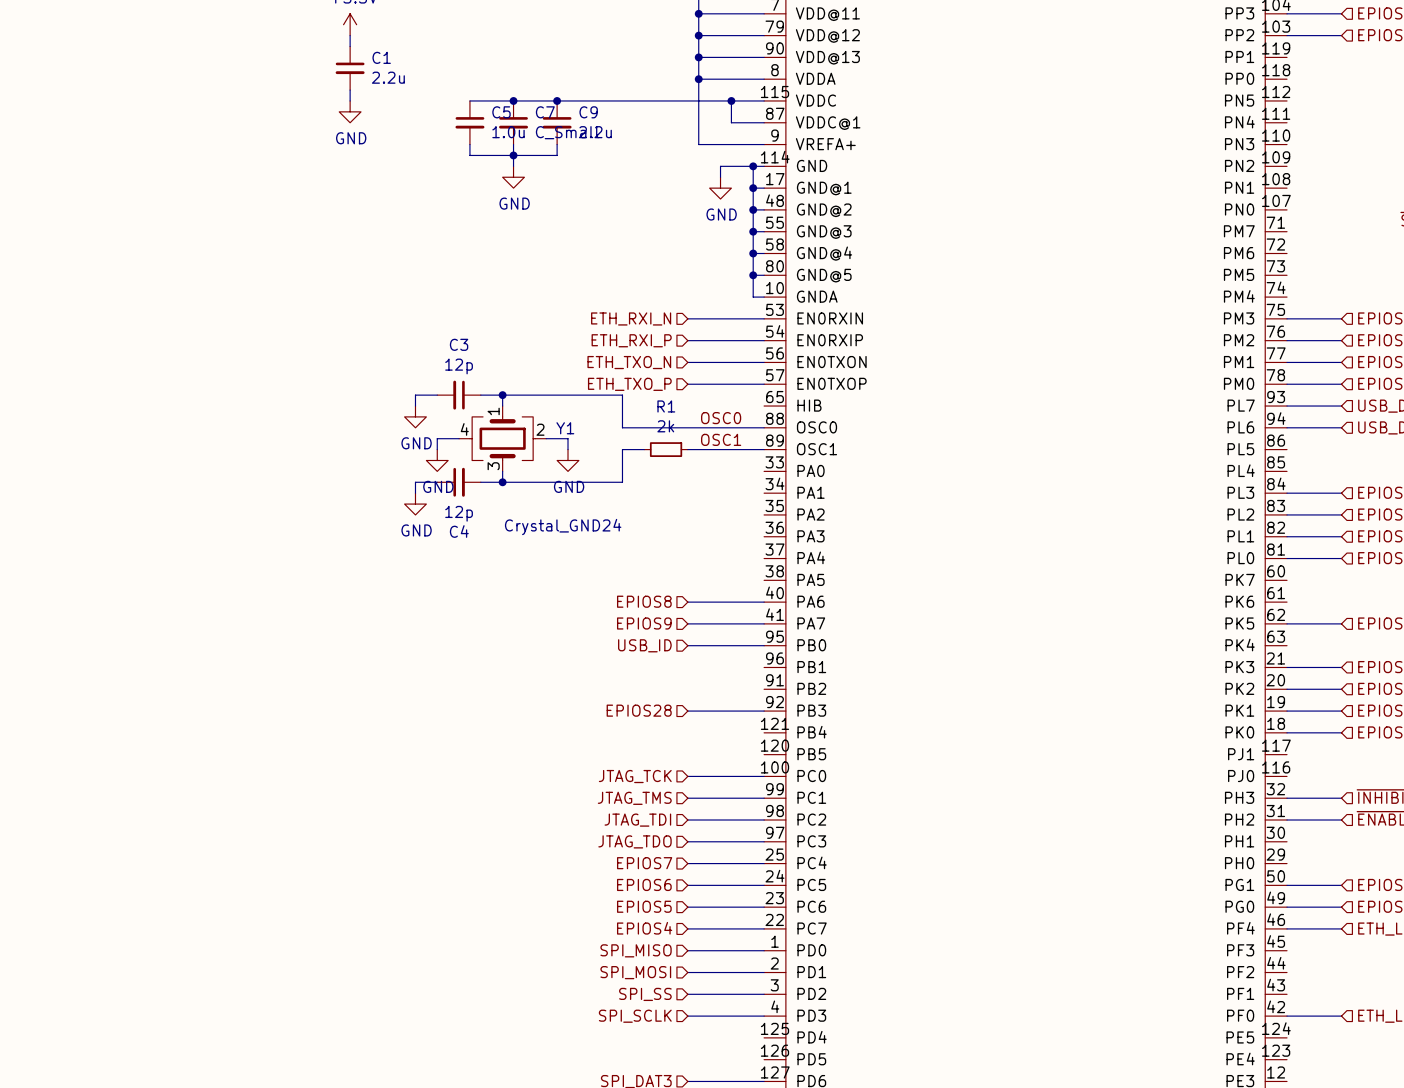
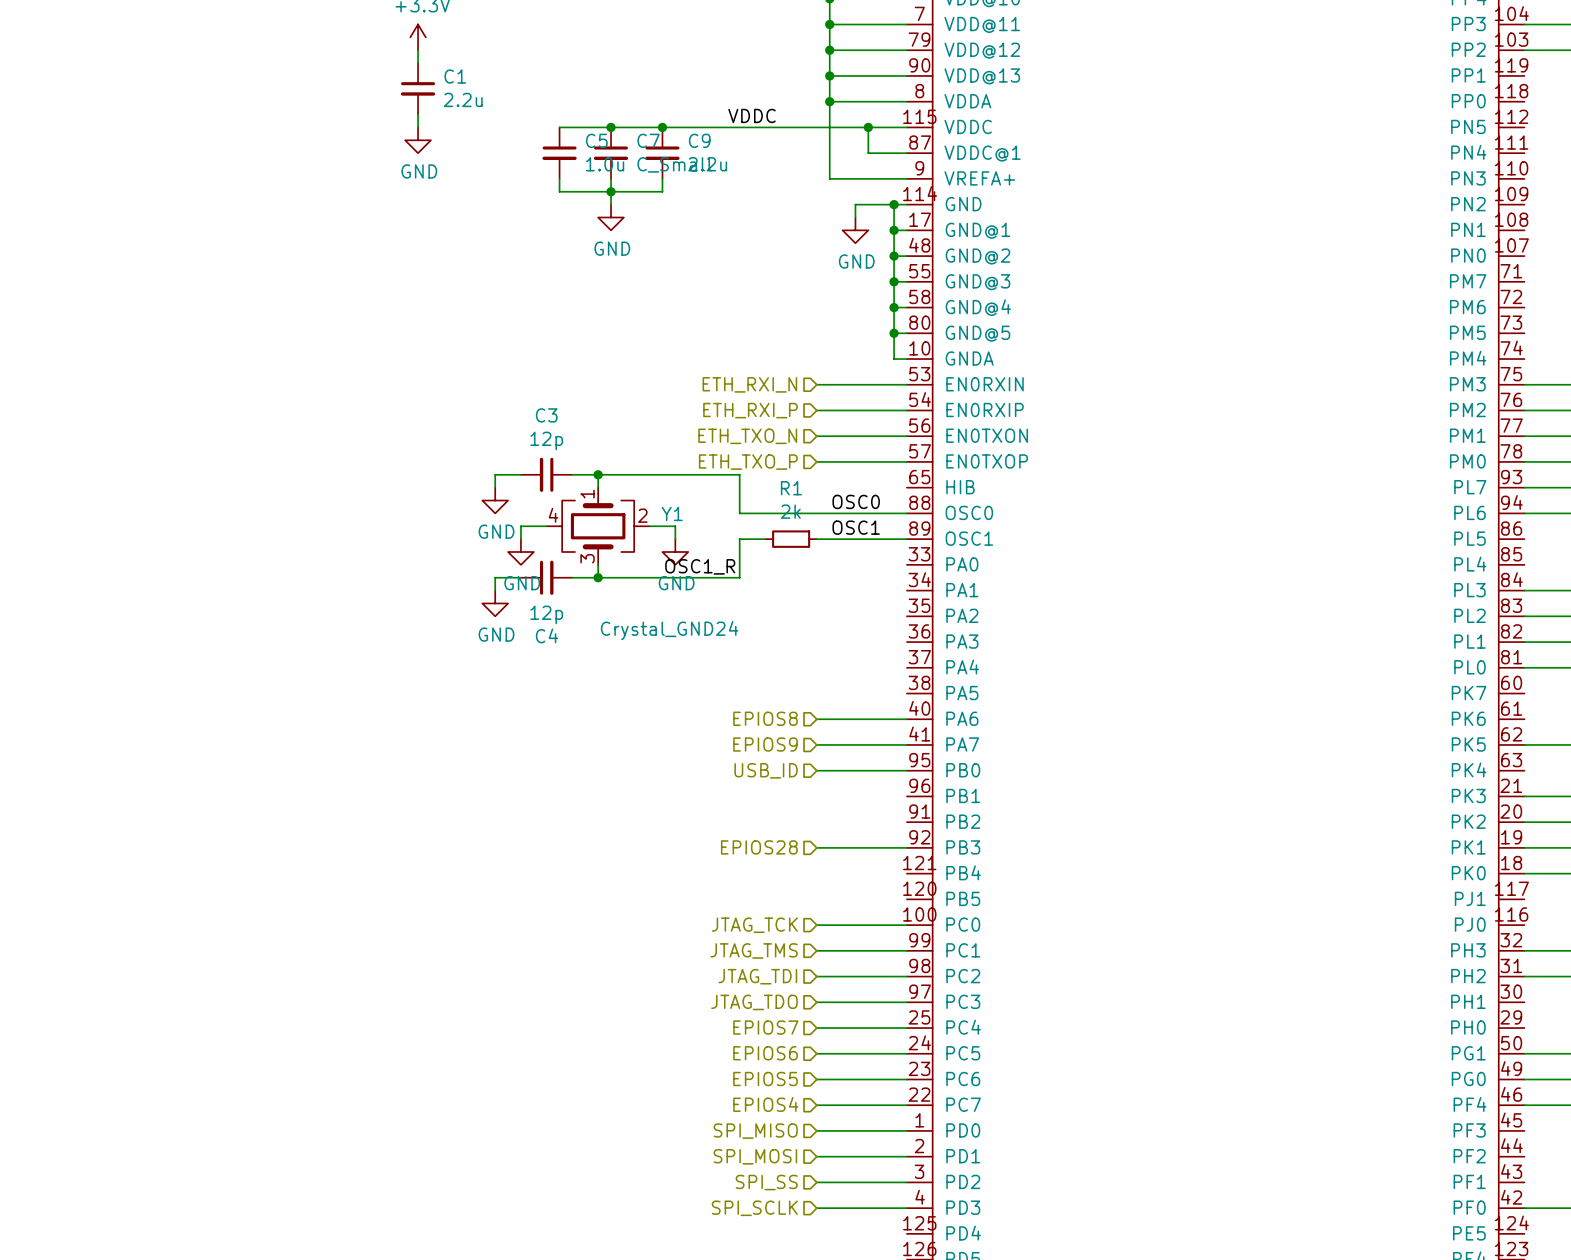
label: none -> VDDC (752, 115)
label: none -> OSC1_R (700, 566)

